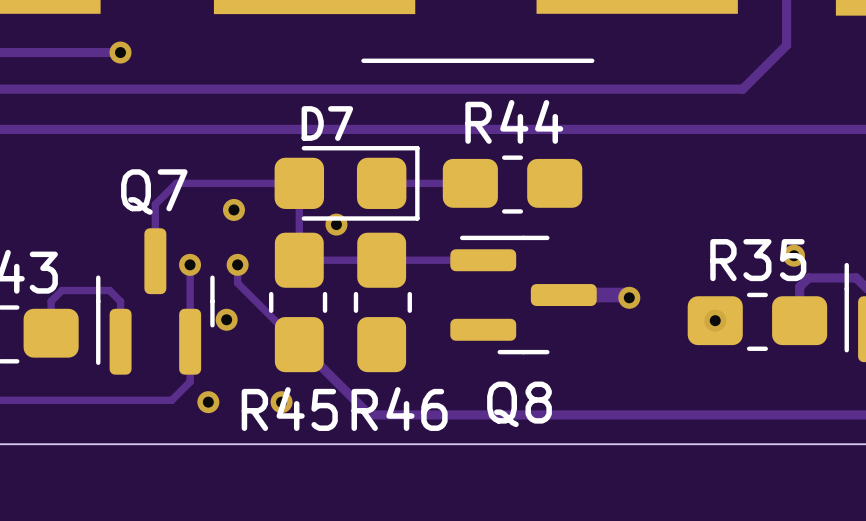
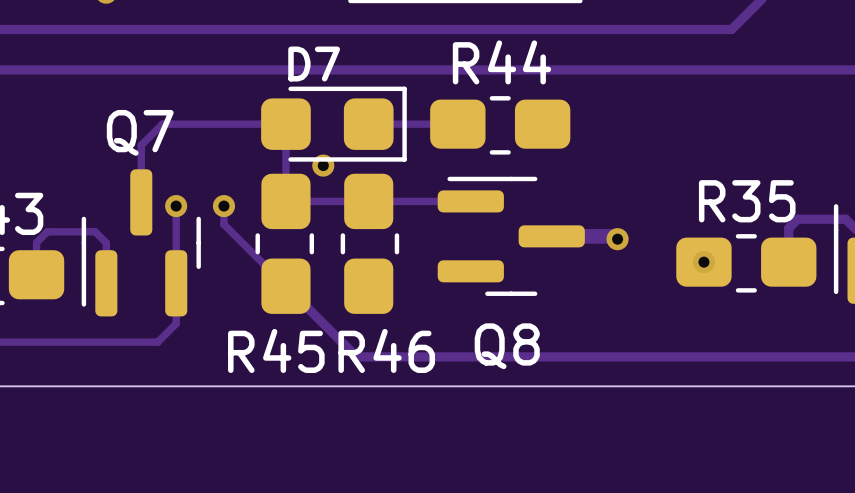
via: (233, 209) -> none
via: (794, 255) -> none
via: (226, 319) -> none
via: (208, 402) -> none
via: (281, 402) -> none

